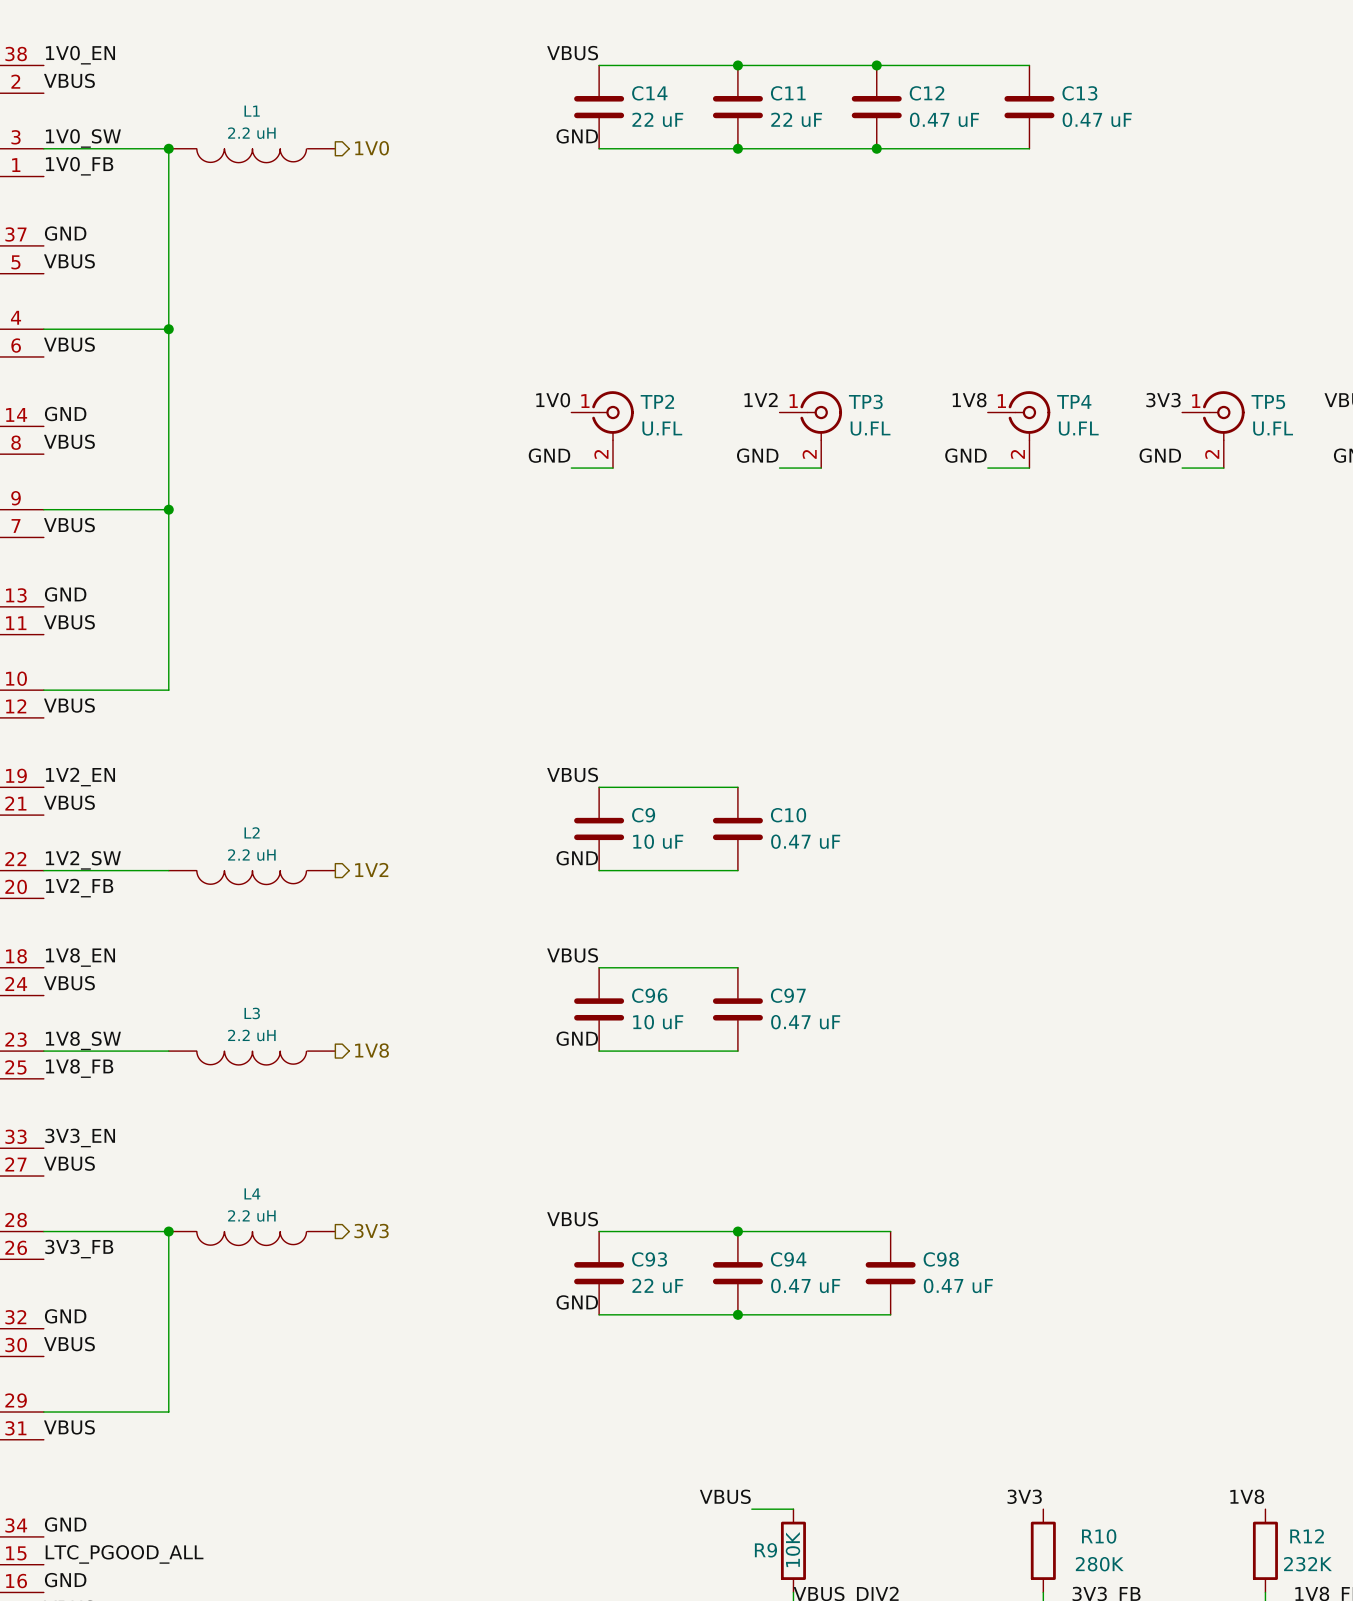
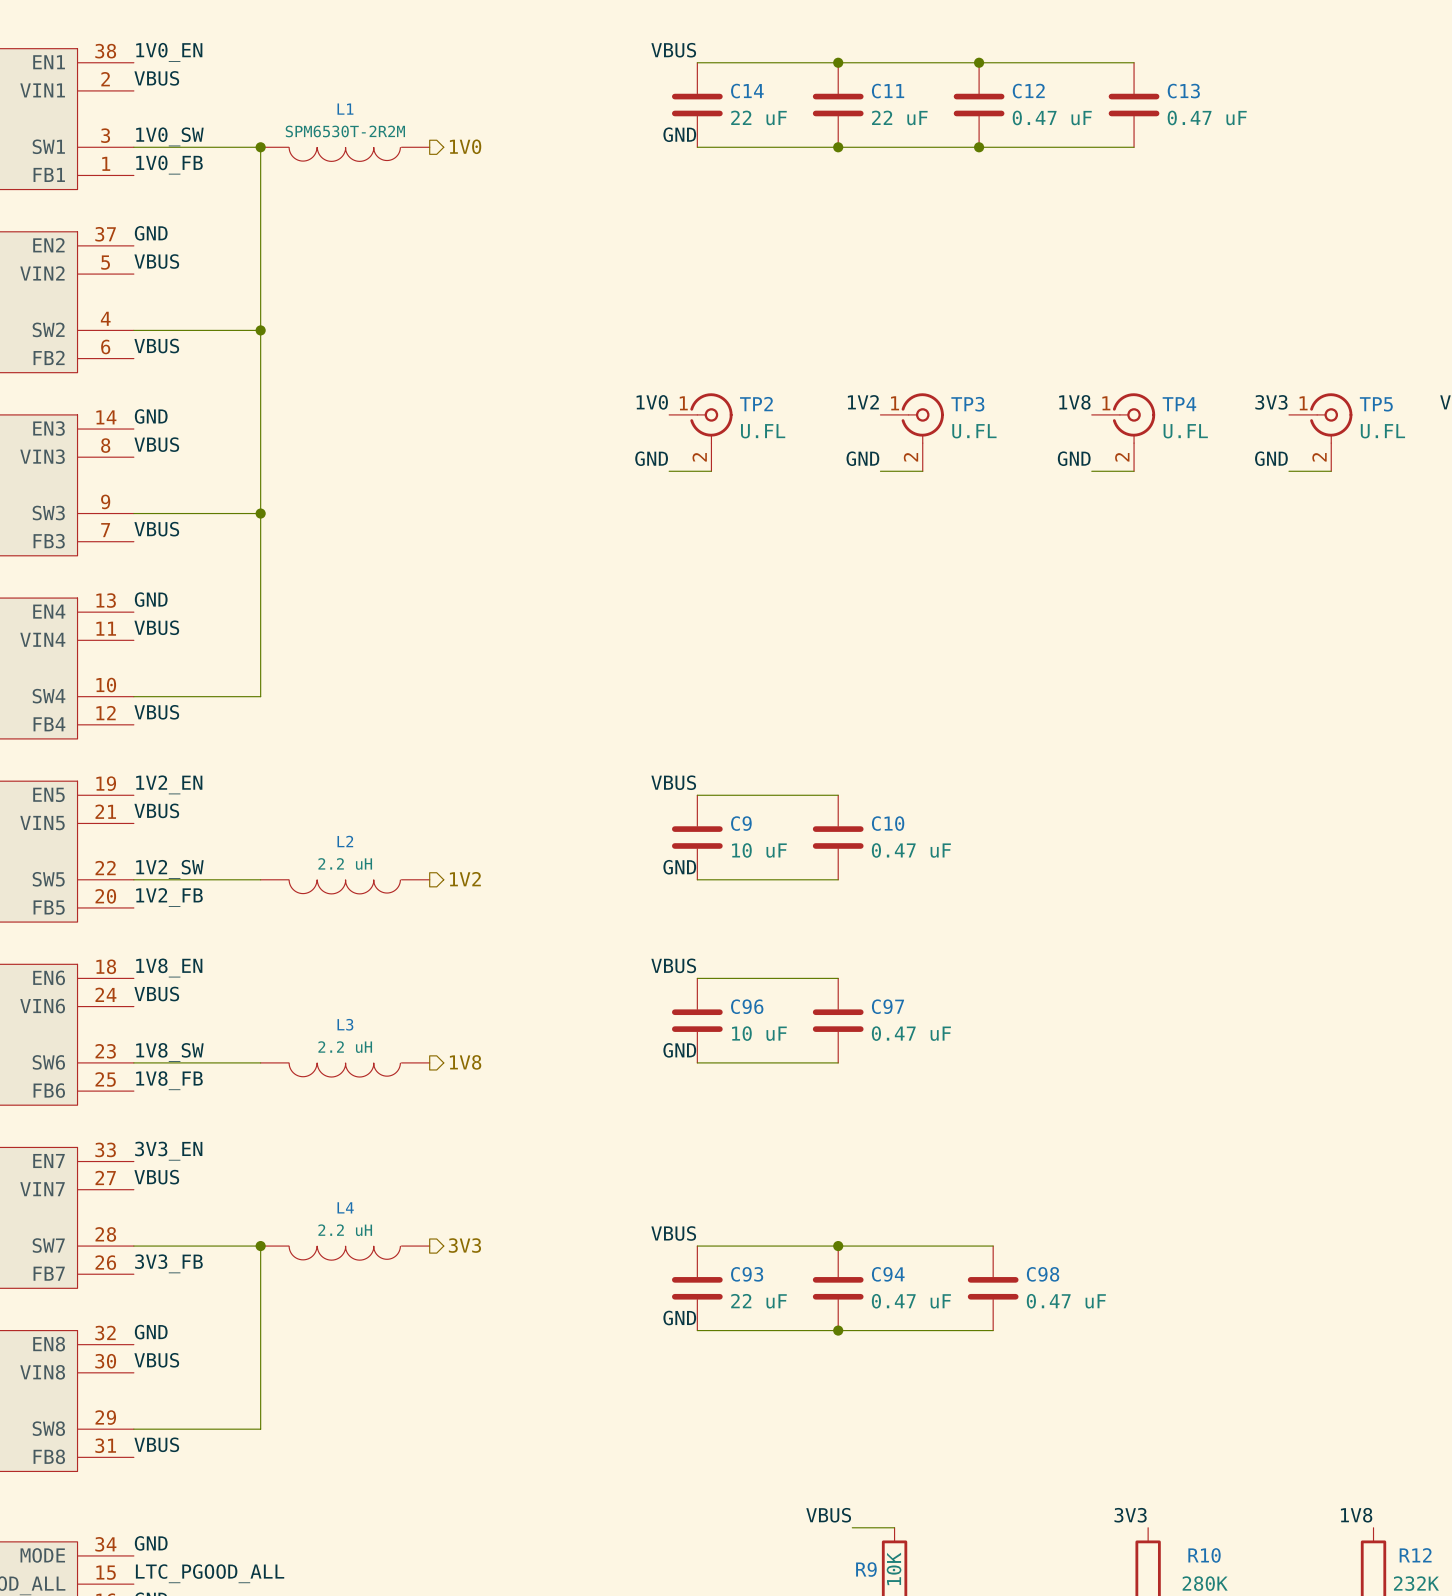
L1 value: 2.2 uH (251, 133) -> SPM6530T-2R2M (345, 131)

